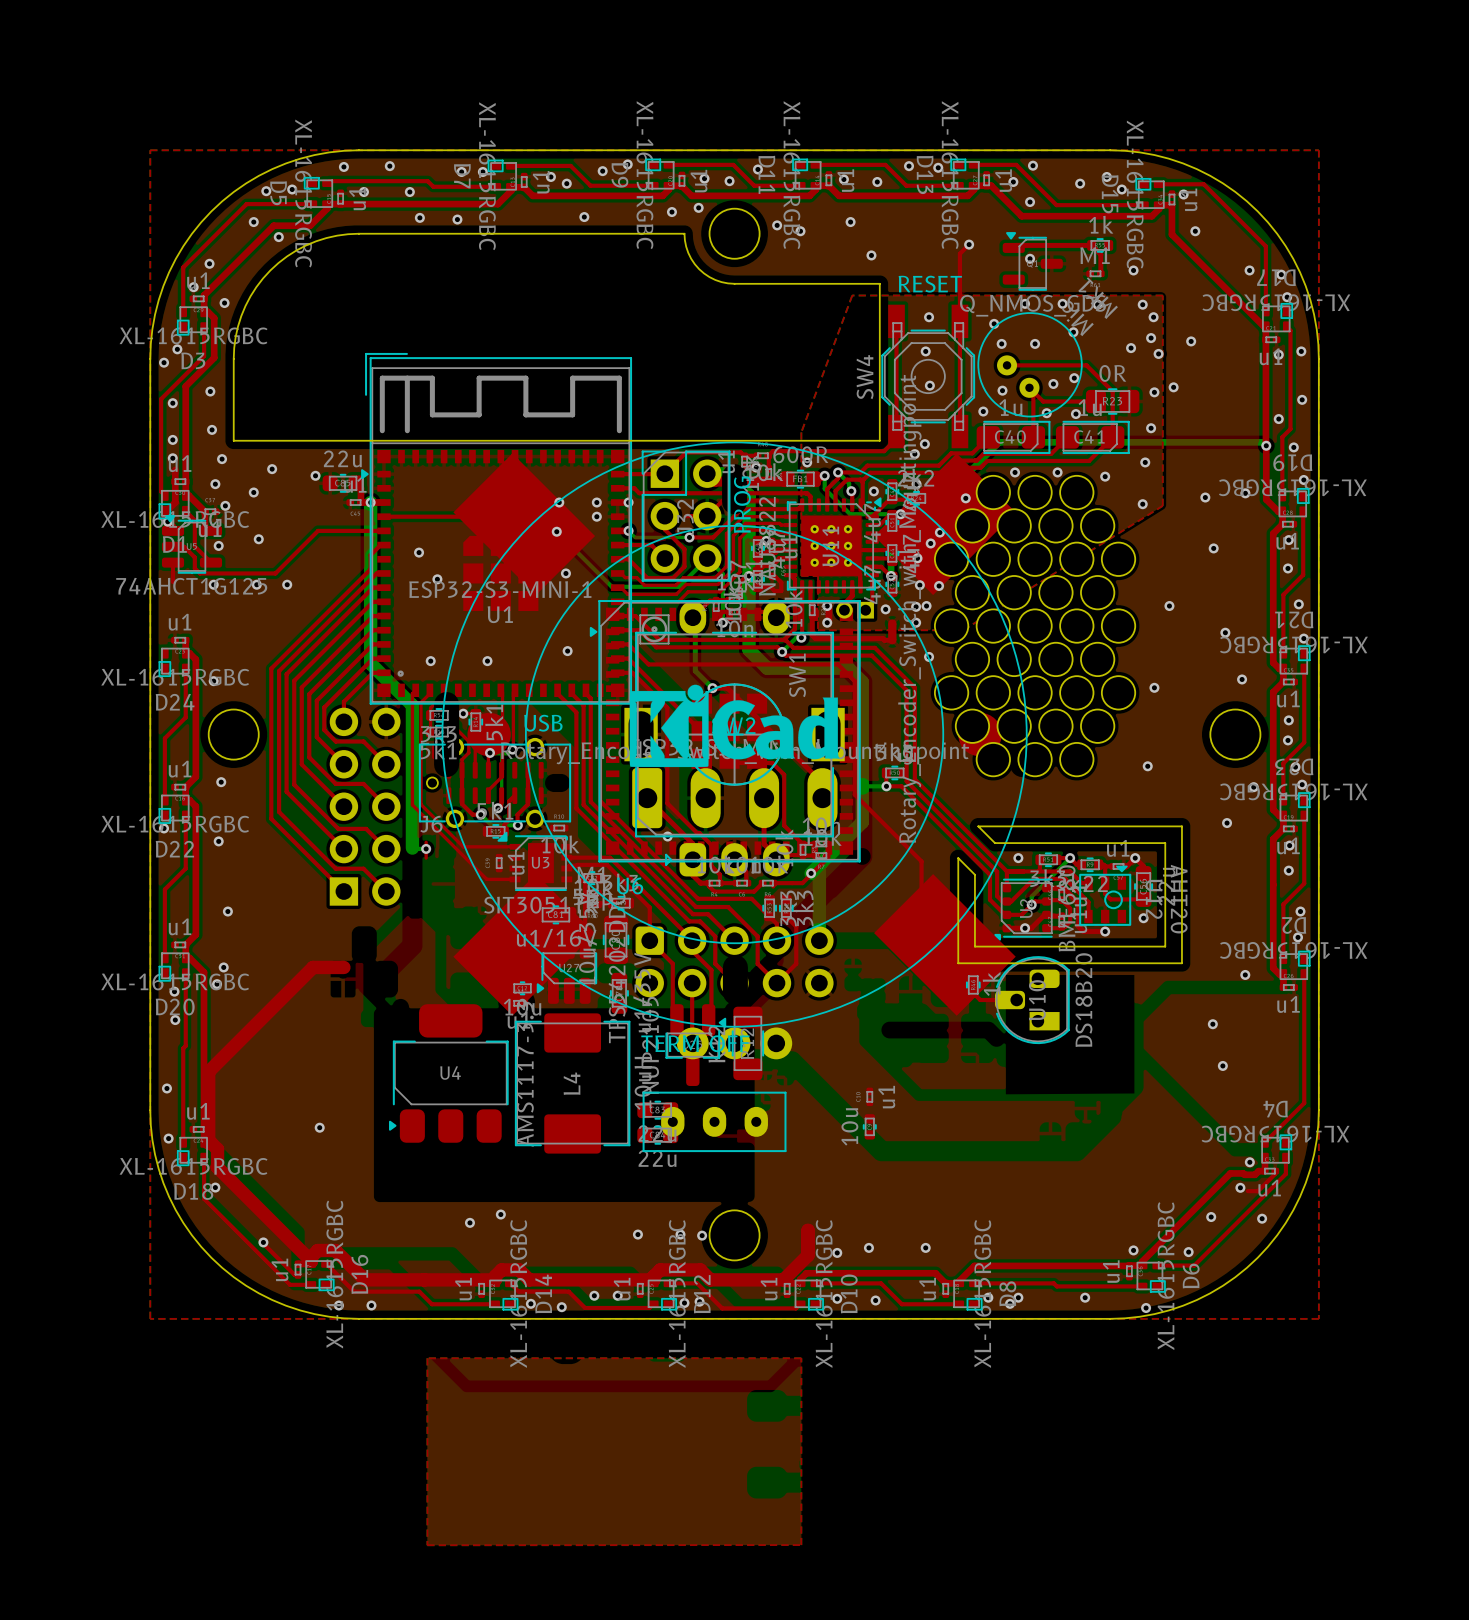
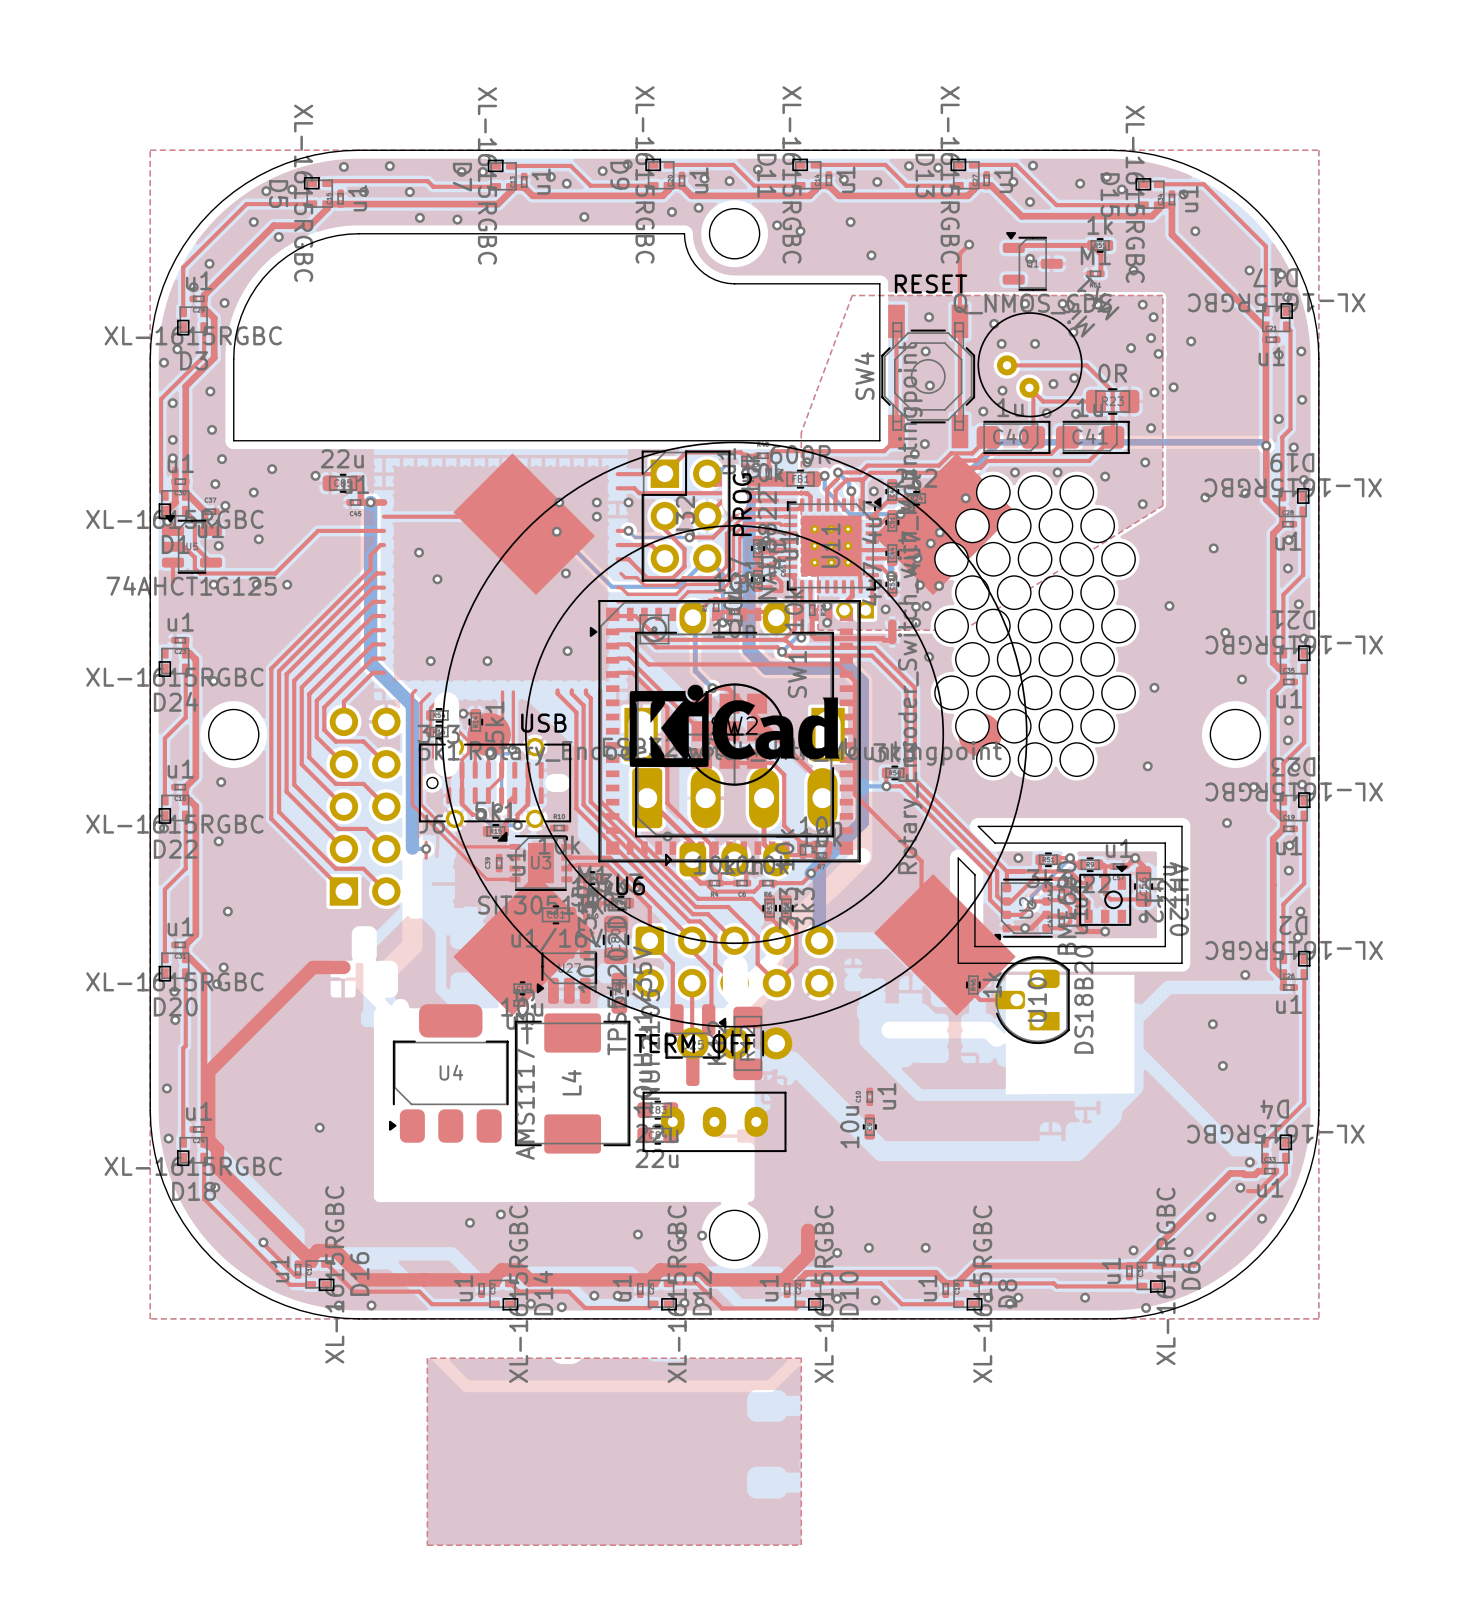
U1: ESP32-S3-MINI-1 (496, 528) -> none

